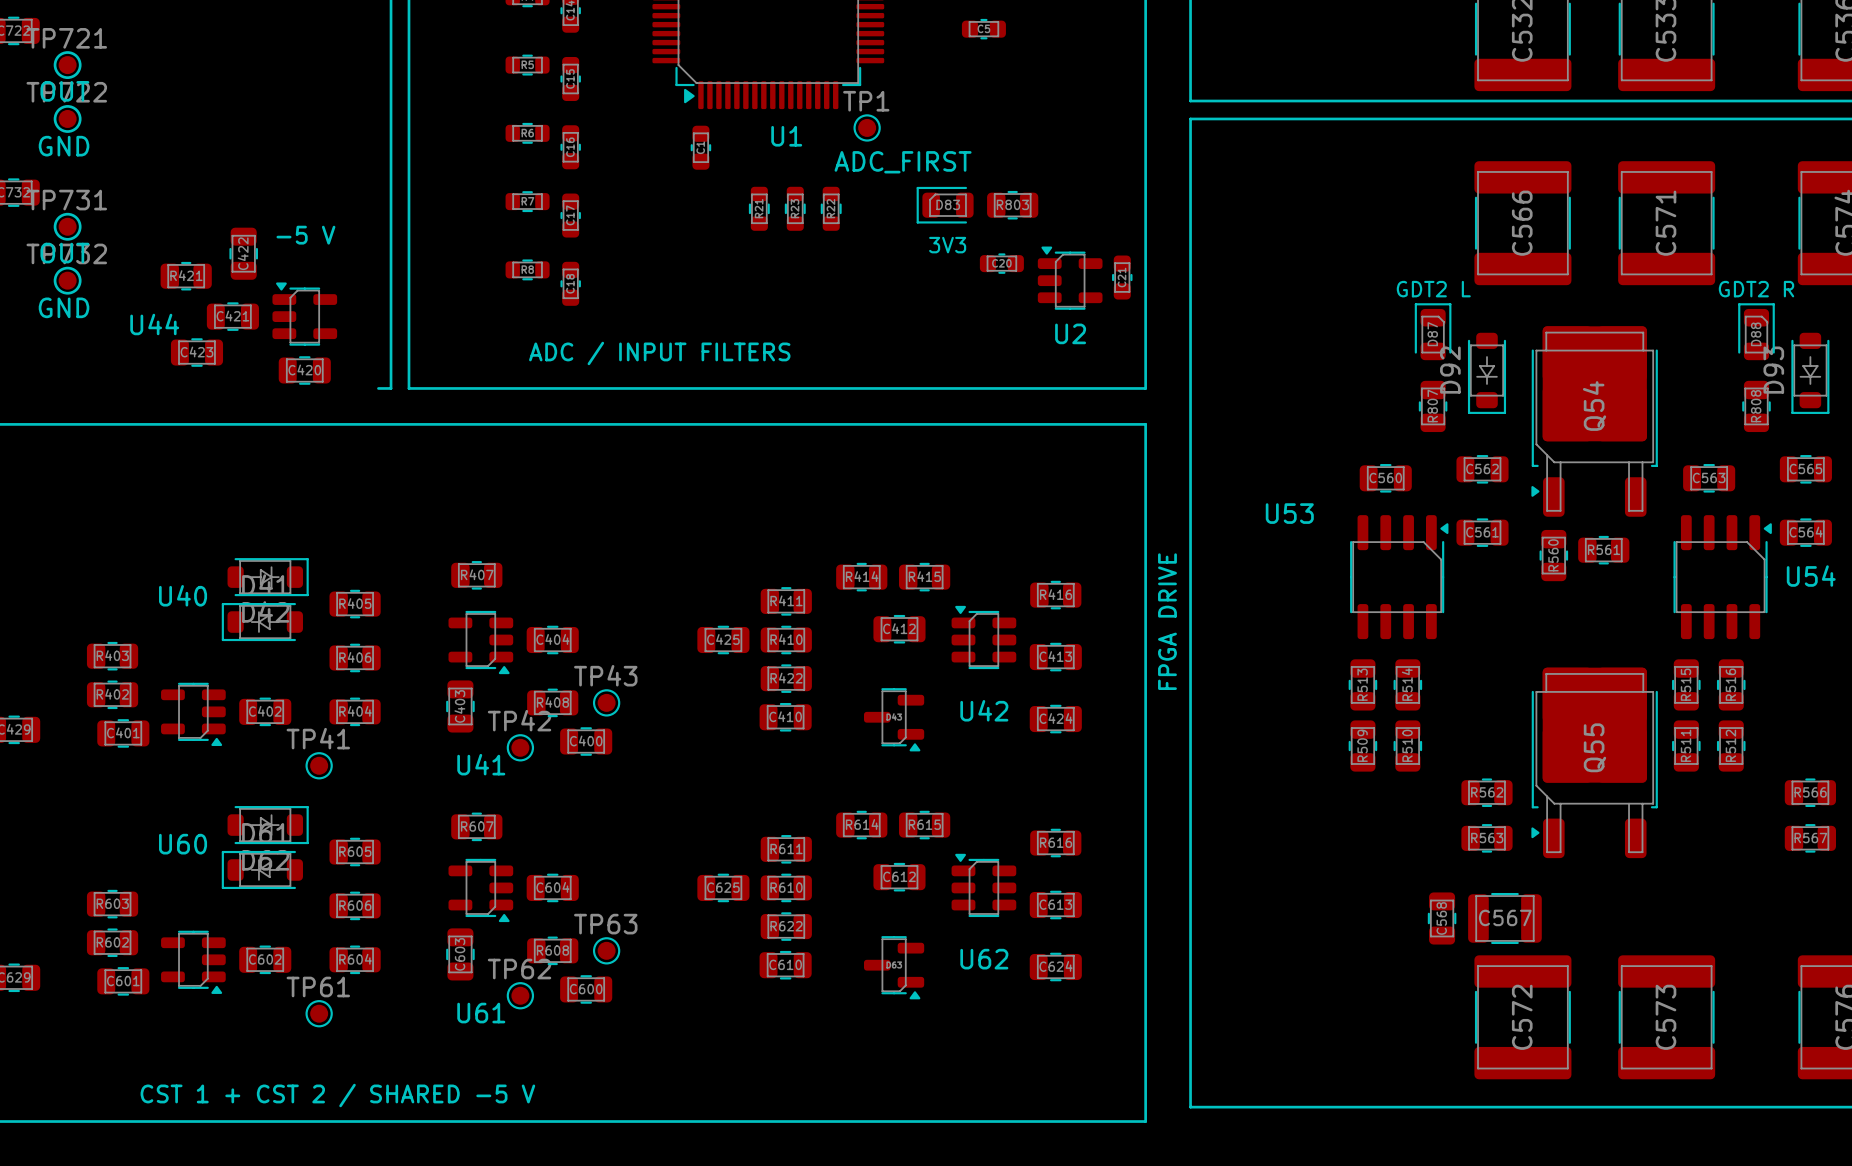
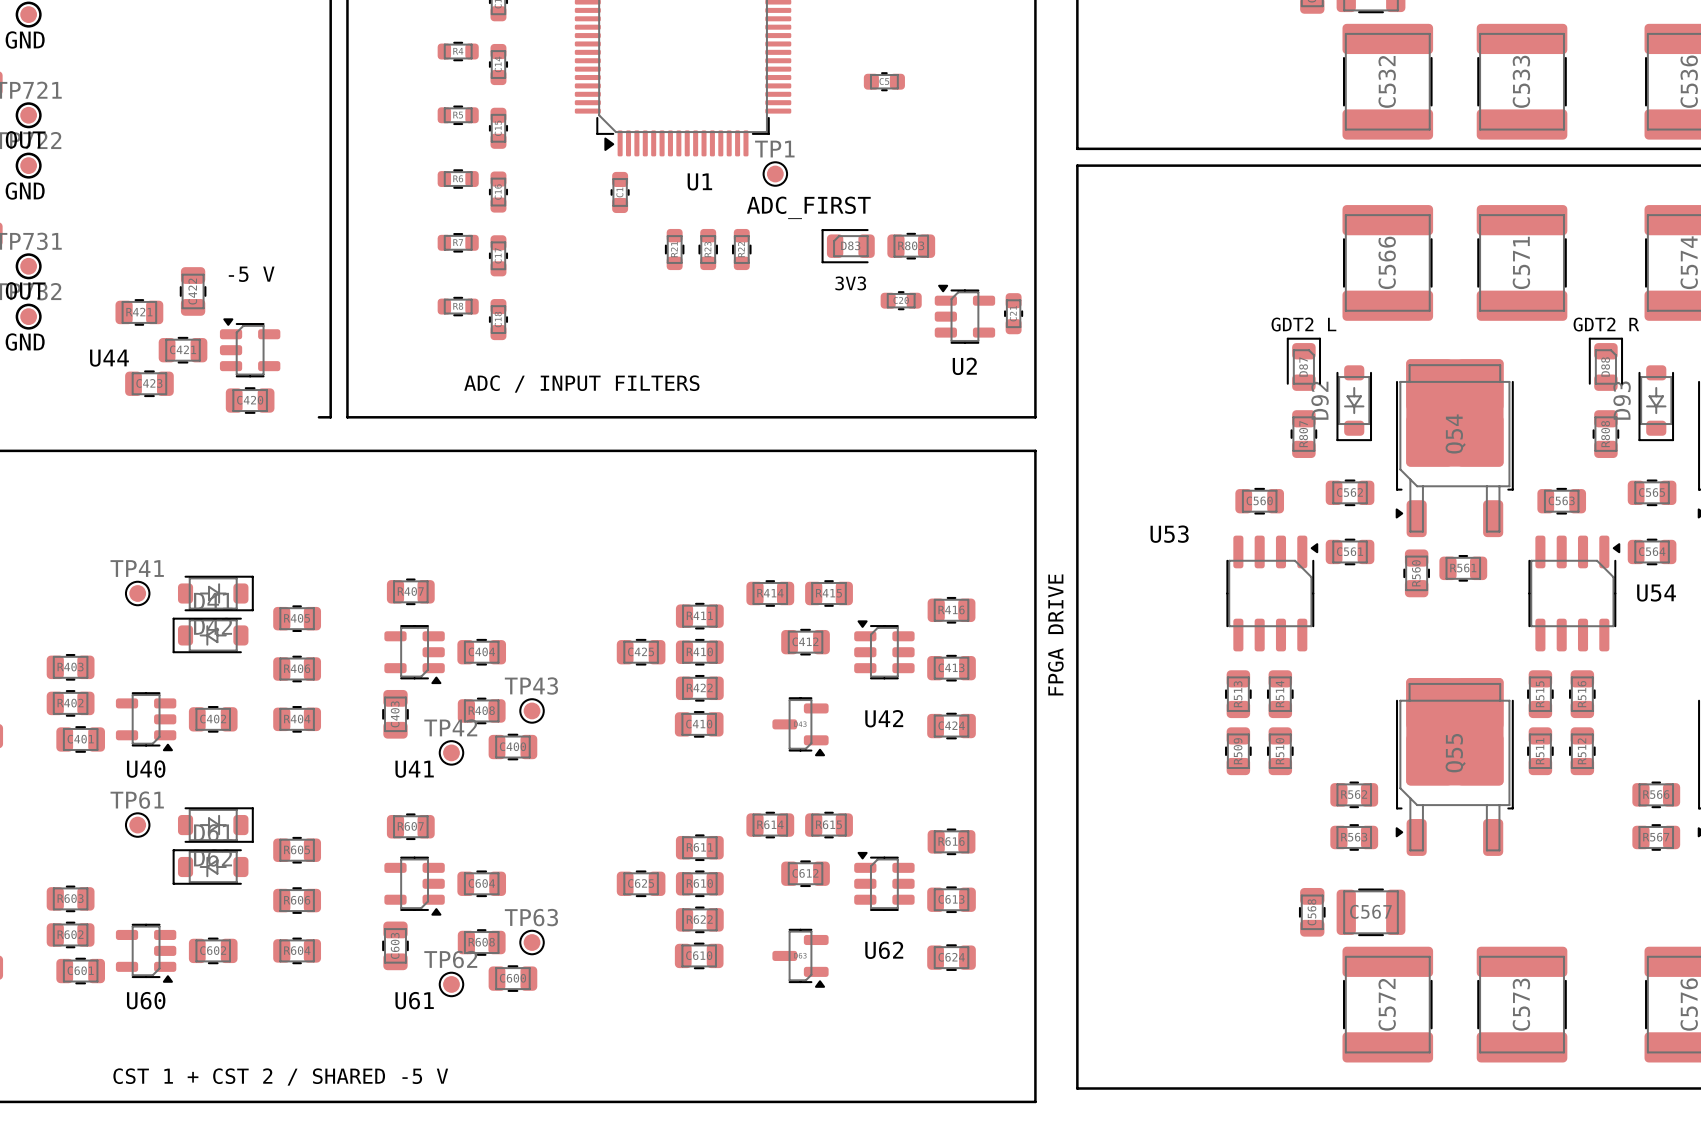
U40 name position: U40 (183, 595) -> U40 (146, 769)
TP41 position: (319, 765) -> (137, 593)
U60 name position: U60 (183, 844) -> U60 (146, 1000)
TP61 position: (319, 1013) -> (137, 825)

